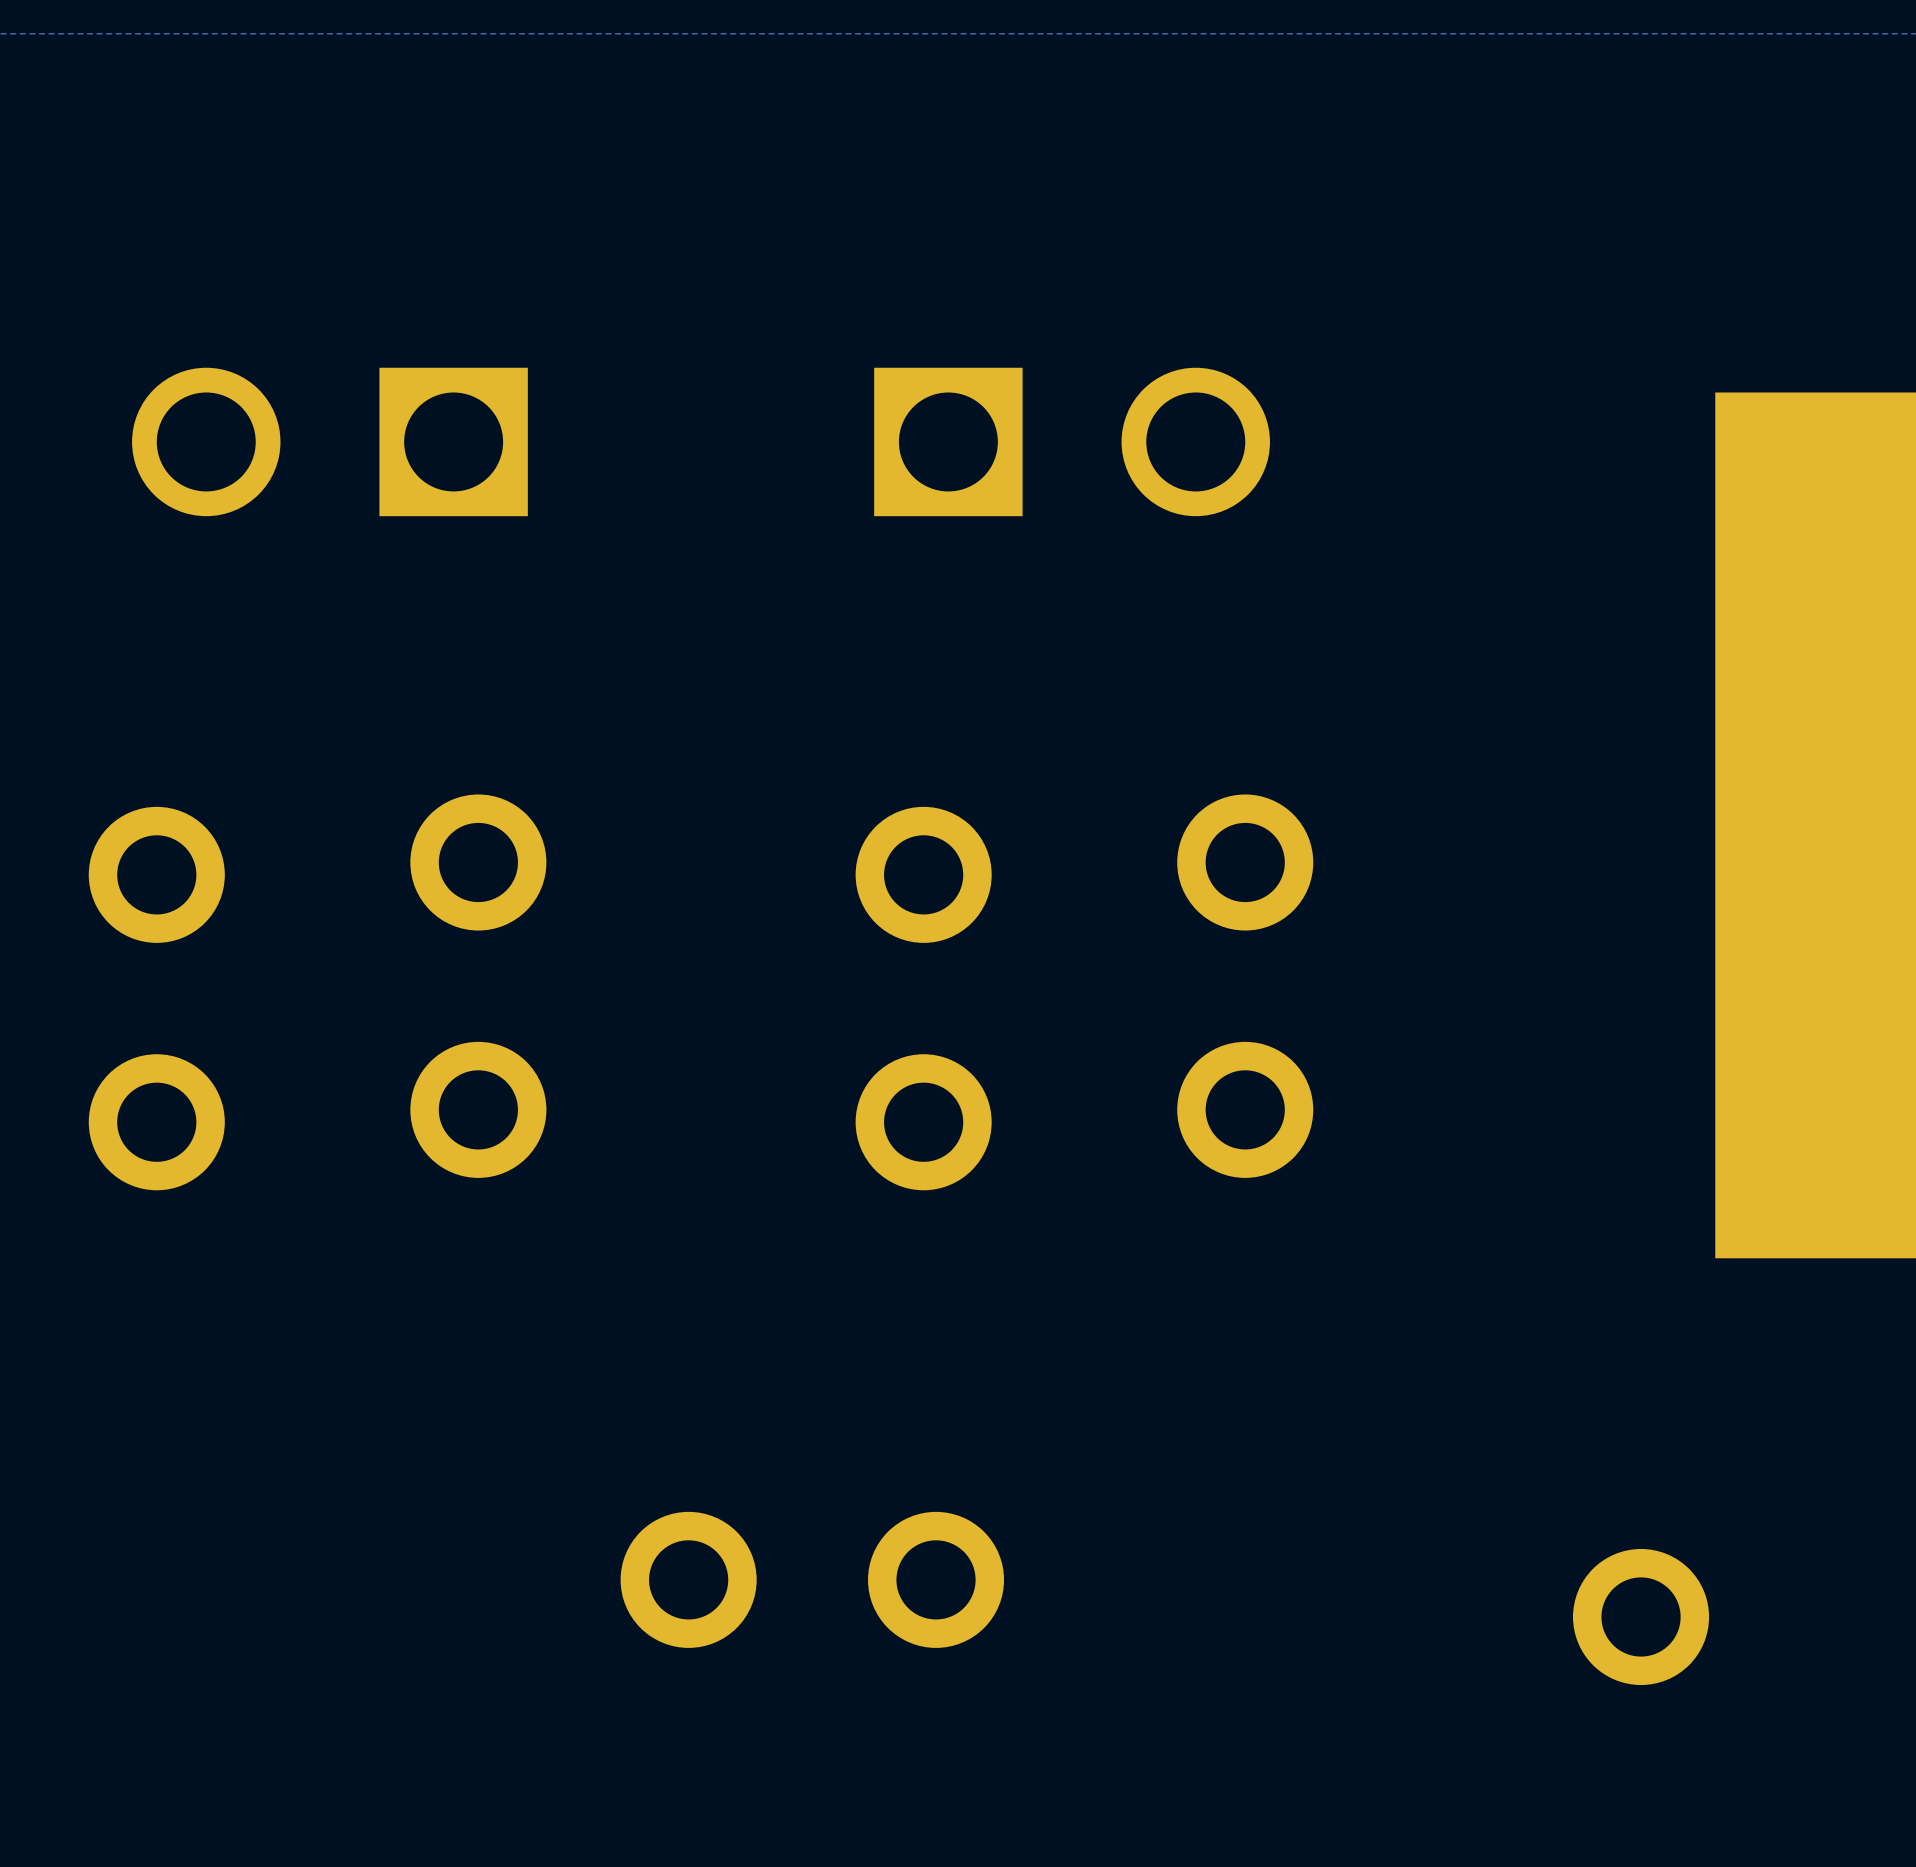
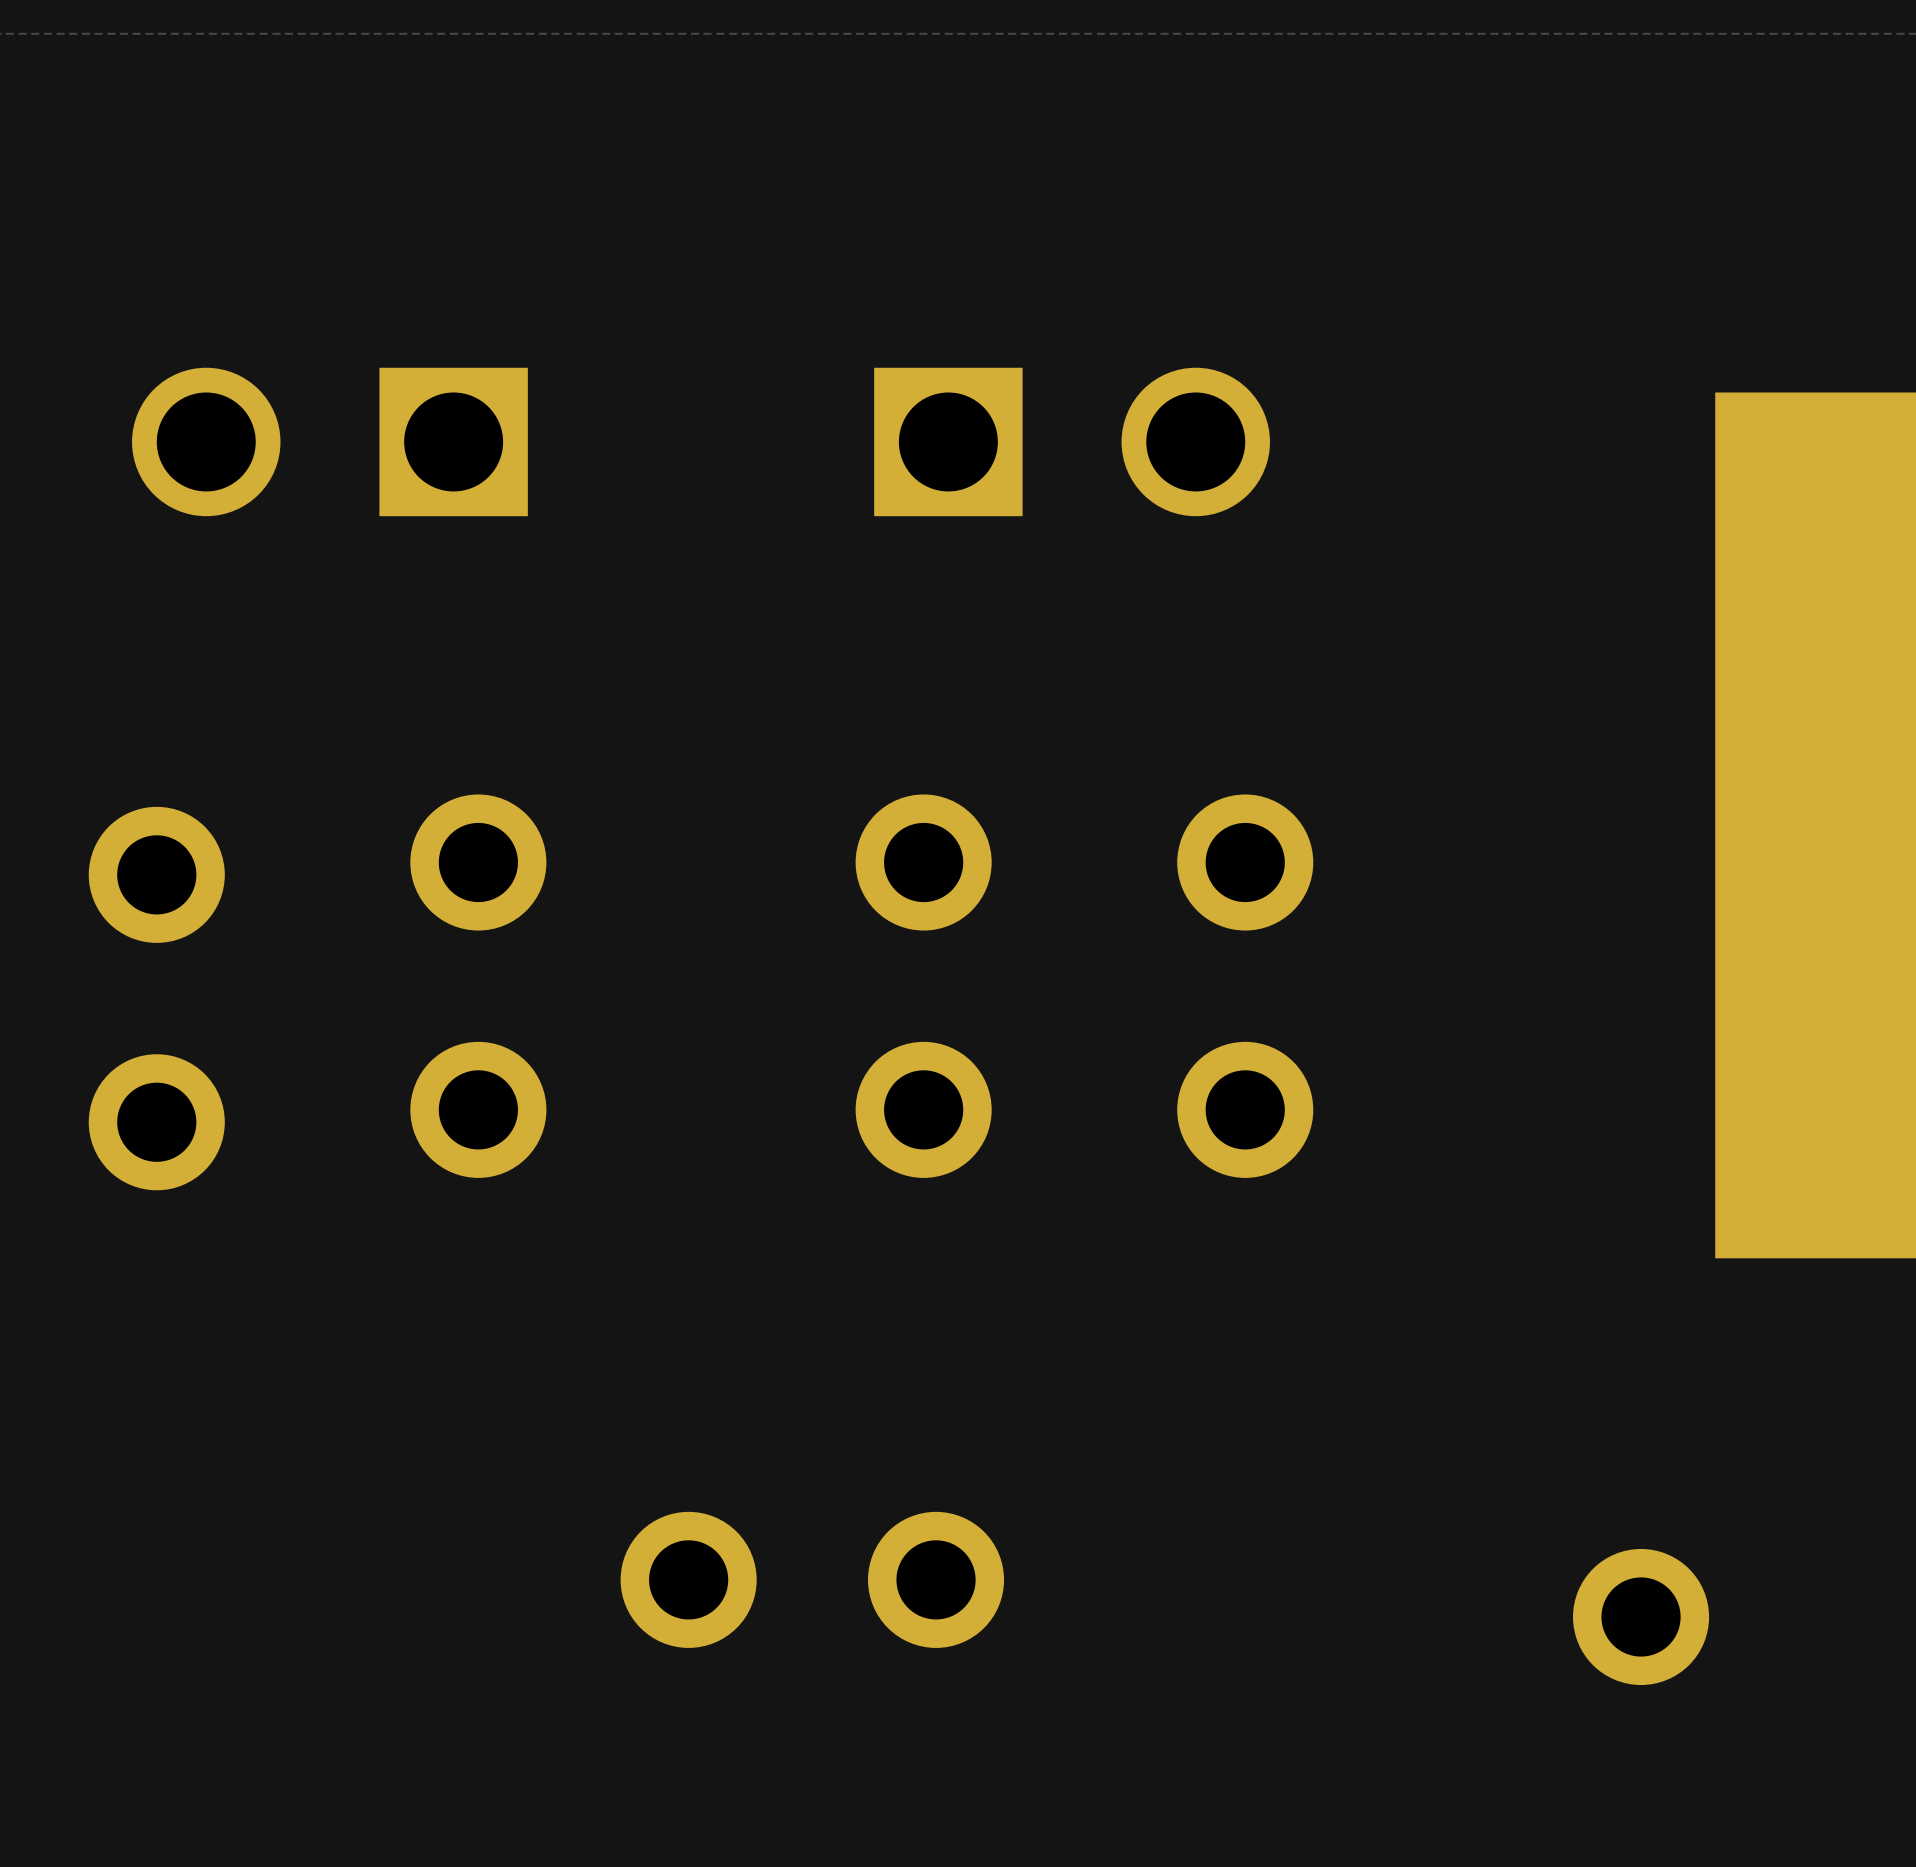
part position: (923, 998) -> (923, 986)

